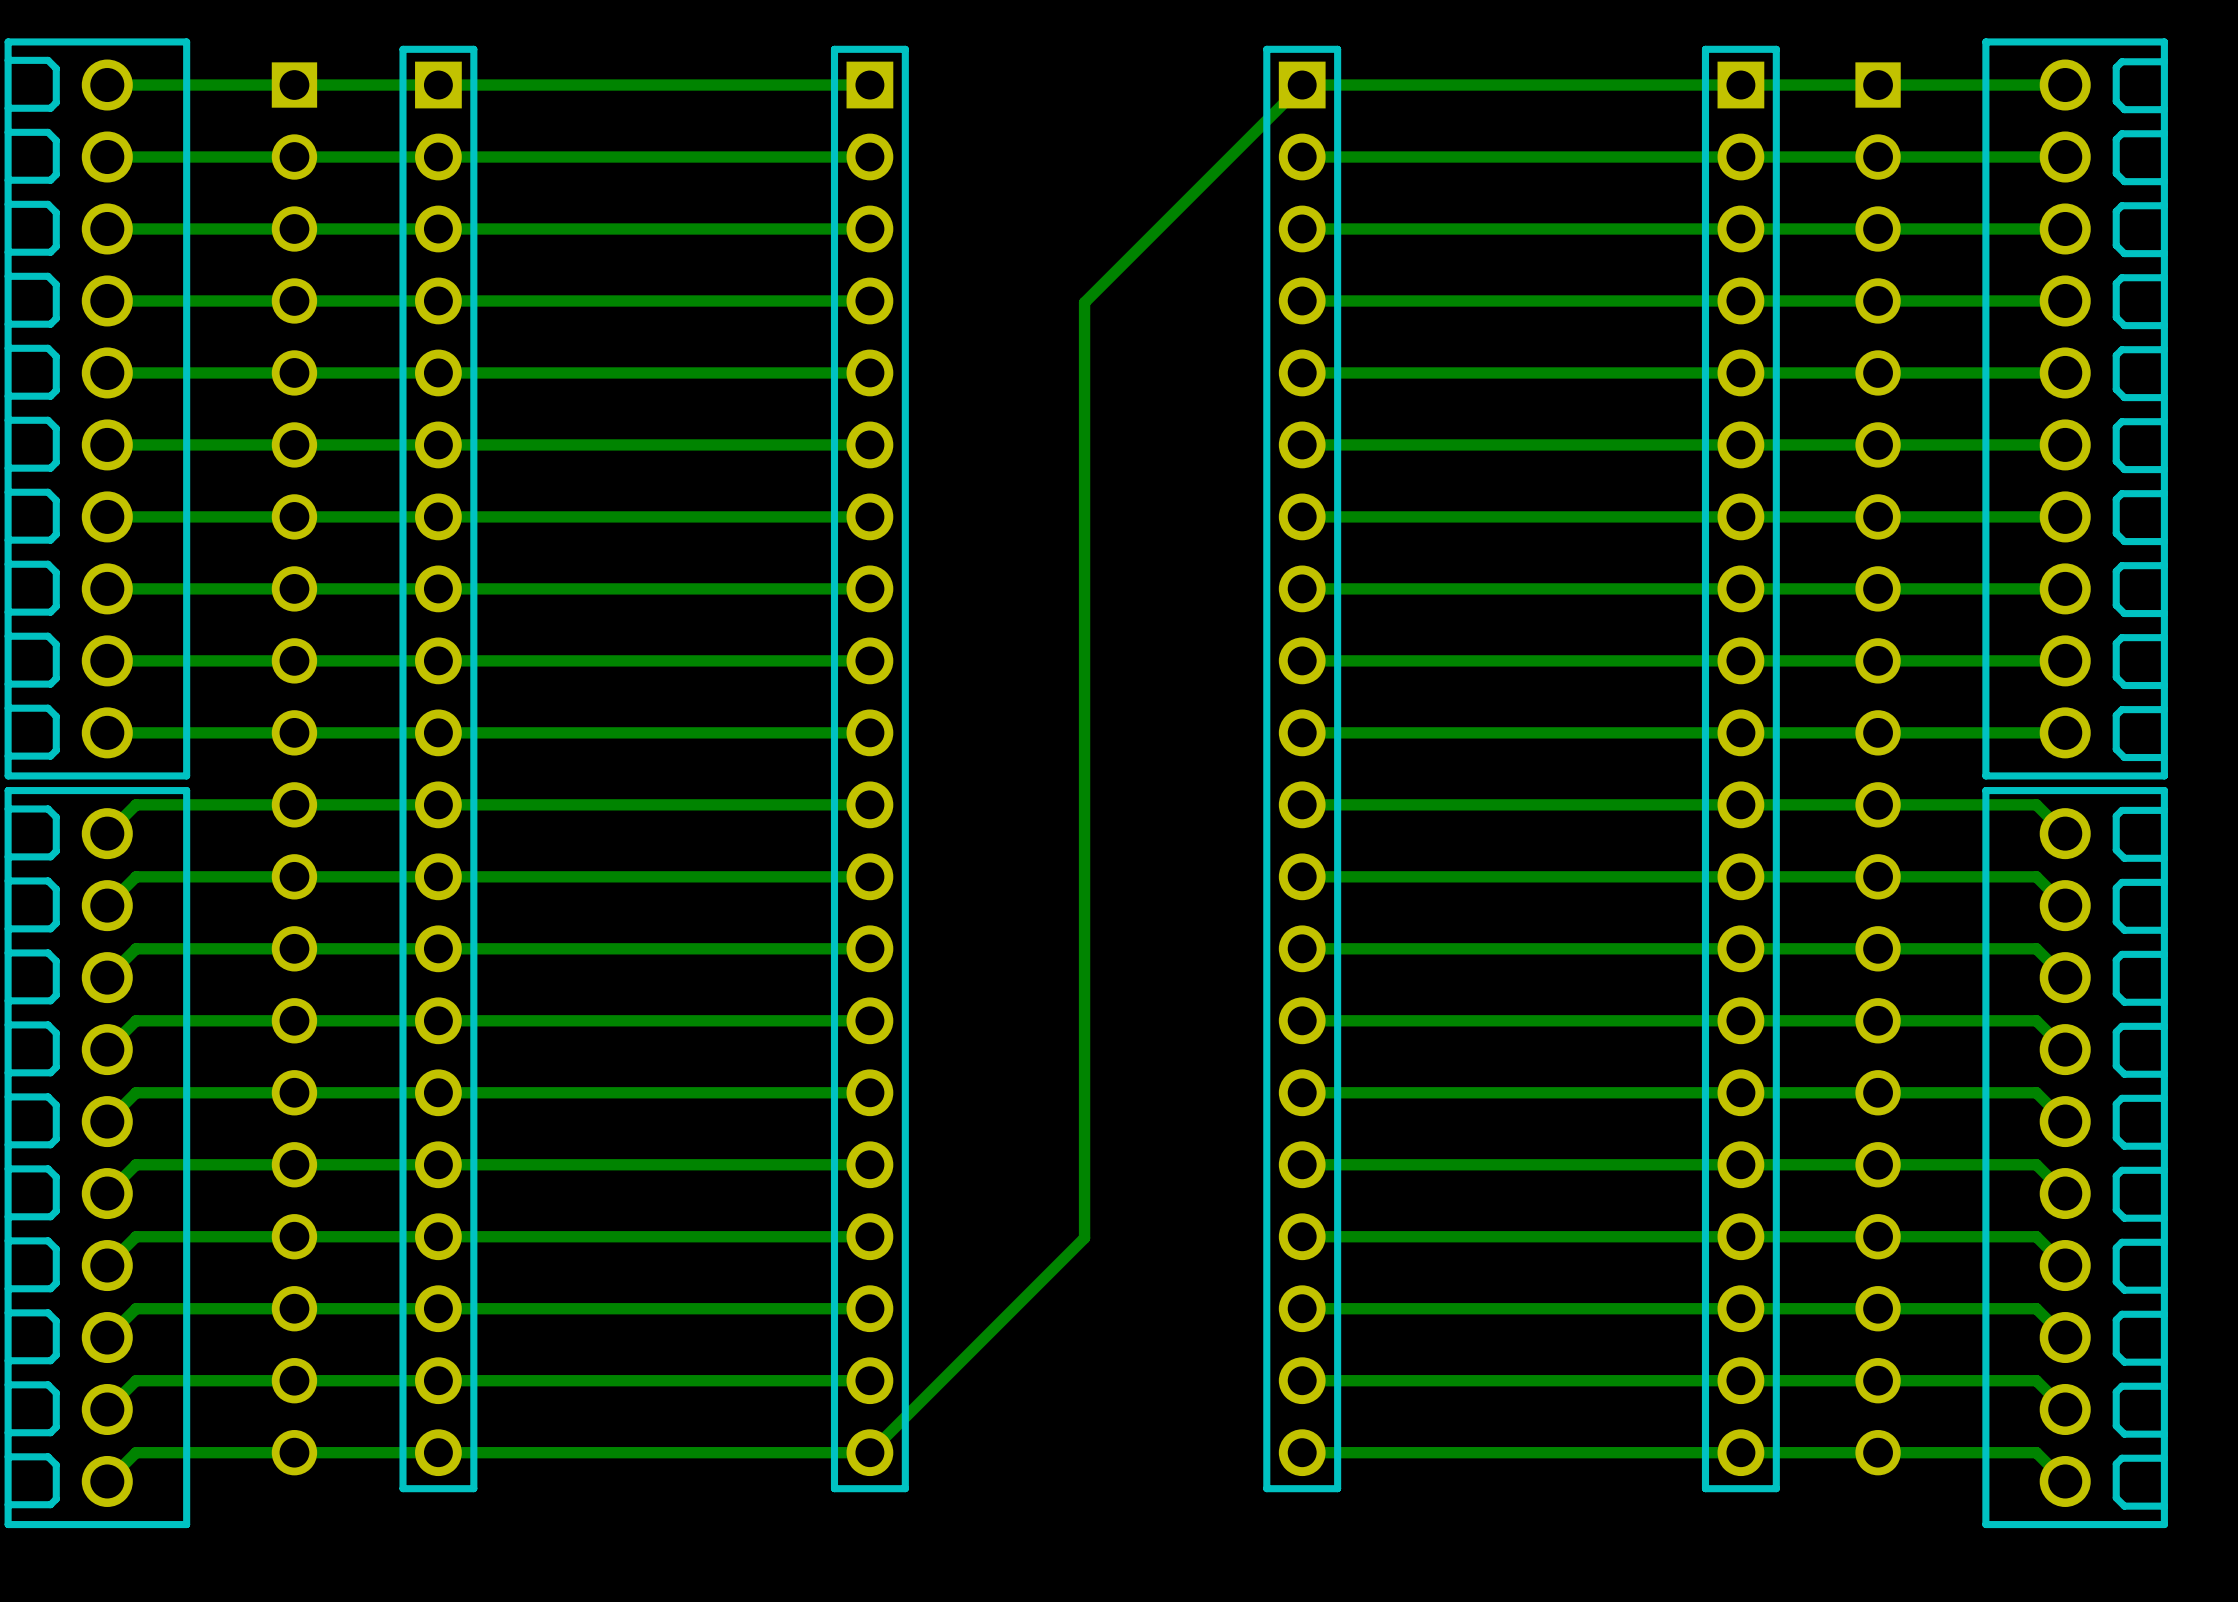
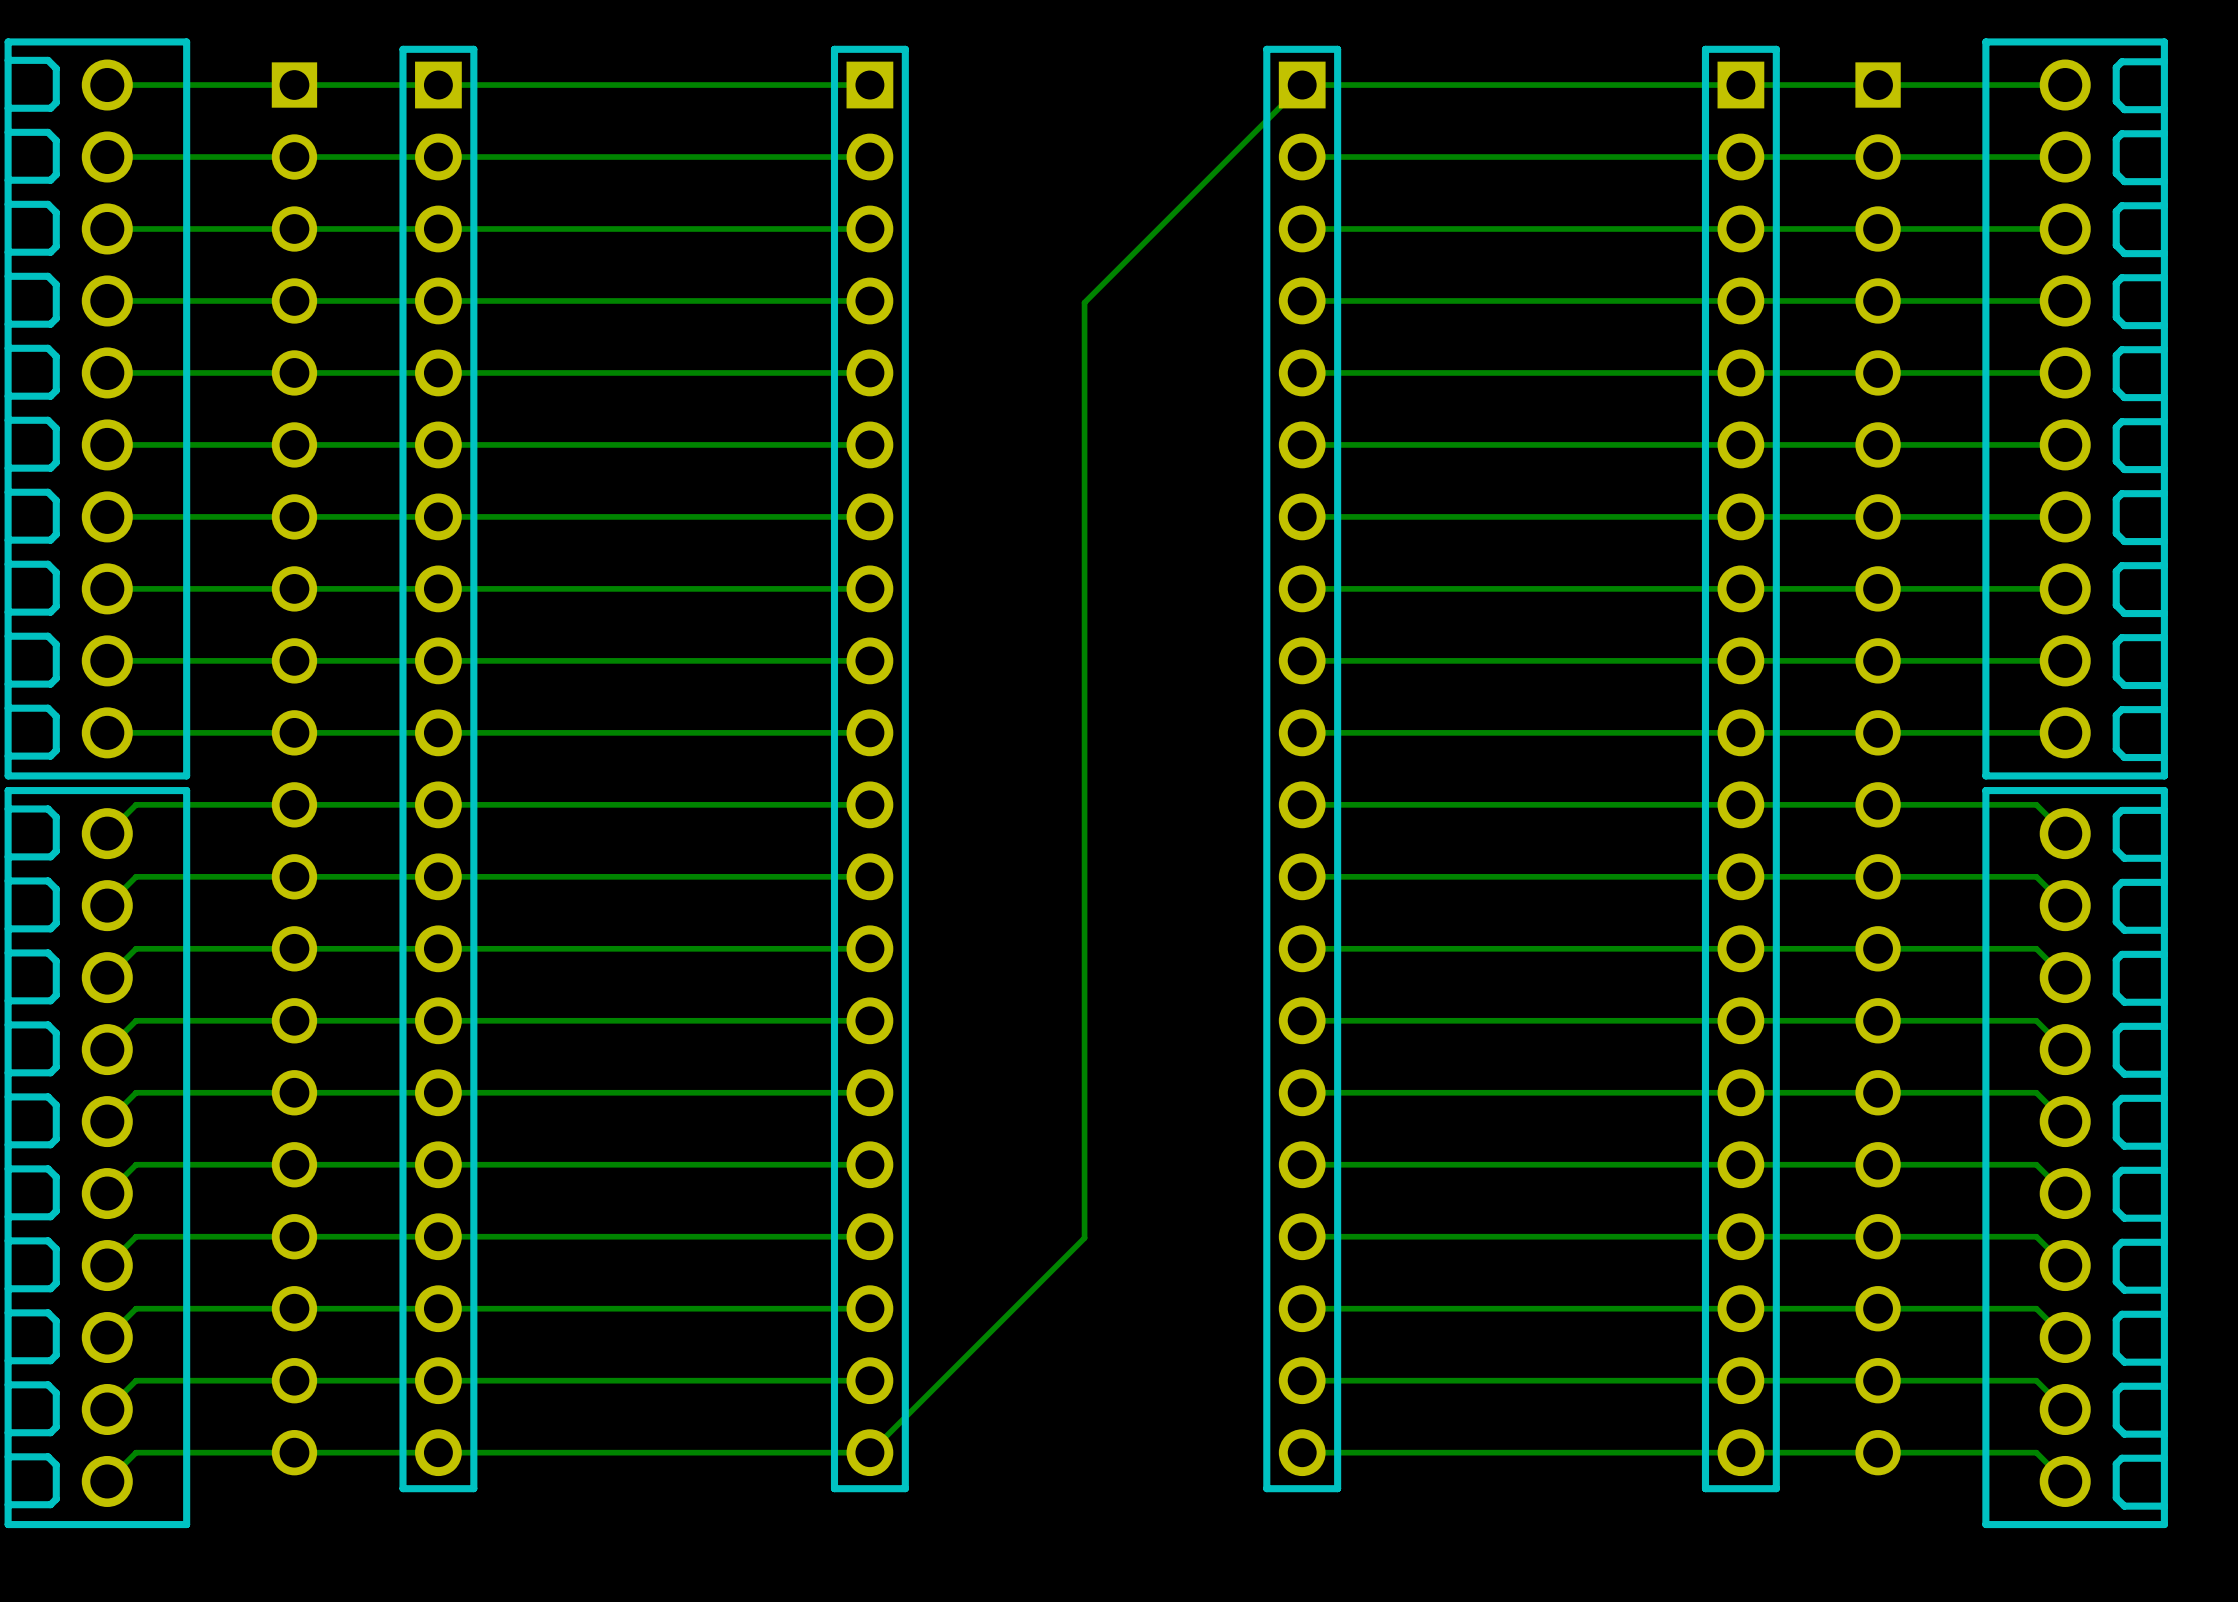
bottom track width: thick (107, 85) (869, 85) -> thin (107, 85) (869, 85)
bottom track width: thick (2065, 85) (1302, 85) (1084, 302) (1084, 1238) (869, 1452) (136, 1452) (107, 1481) -> thin (2065, 85) (1302, 85) (1084, 302) (1084, 1238) (869, 1452) (136, 1452) (107, 1481)
bottom track width: thick (107, 157) (869, 157) -> thin (107, 157) (869, 157)
bottom track width: thick (1302, 157) (2065, 157) -> thin (1302, 157) (2065, 157)
bottom track width: thick (107, 228) (869, 228) -> thin (107, 228) (869, 228)
bottom track width: thick (1302, 228) (2065, 228) -> thin (1302, 228) (2065, 228)
bottom track width: thick (107, 300) (869, 300) -> thin (107, 300) (869, 300)
bottom track width: thick (1302, 300) (2065, 300) -> thin (1302, 300) (2065, 300)
bottom track width: thick (107, 372) (869, 372) -> thin (107, 372) (869, 372)
bottom track width: thick (1302, 372) (2065, 372) -> thin (1302, 372) (2065, 372)
bottom track width: thick (107, 444) (869, 444) -> thin (107, 444) (869, 444)
bottom track width: thick (1302, 444) (2065, 444) -> thin (1302, 444) (2065, 444)
bottom track width: thick (107, 516) (869, 516) -> thin (107, 516) (869, 516)
bottom track width: thick (1302, 516) (2065, 516) -> thin (1302, 516) (2065, 516)
bottom track width: thick (107, 588) (869, 588) -> thin (107, 588) (869, 588)
bottom track width: thick (1302, 588) (2065, 588) -> thin (1302, 588) (2065, 588)
bottom track width: thick (107, 660) (869, 660) -> thin (107, 660) (869, 660)
bottom track width: thick (1302, 660) (2065, 660) -> thin (1302, 660) (2065, 660)
bottom track width: thick (107, 732) (869, 732) -> thin (107, 732) (869, 732)
bottom track width: thick (1302, 732) (2065, 732) -> thin (1302, 732) (2065, 732)
bottom track width: thick (869, 804) (136, 804) (107, 833) -> thin (869, 804) (136, 804) (107, 833)
bottom track width: thick (1302, 804) (2036, 804) (2065, 833) -> thin (1302, 804) (2036, 804) (2065, 833)
bottom track width: thick (869, 876) (136, 876) (107, 905) -> thin (869, 876) (136, 876) (107, 905)
bottom track width: thick (1302, 876) (2036, 876) (2065, 905) -> thin (1302, 876) (2036, 876) (2065, 905)
bottom track width: thick (869, 948) (136, 948) (107, 977) -> thin (869, 948) (136, 948) (107, 977)
bottom track width: thick (1302, 948) (2036, 948) (2065, 977) -> thin (1302, 948) (2036, 948) (2065, 977)
bottom track width: thick (869, 1020) (136, 1020) (107, 1049) -> thin (869, 1020) (136, 1020) (107, 1049)
bottom track width: thick (1302, 1020) (2036, 1020) (2065, 1049) -> thin (1302, 1020) (2036, 1020) (2065, 1049)
bottom track width: thick (869, 1092) (136, 1092) (107, 1121) -> thin (869, 1092) (136, 1092) (107, 1121)
bottom track width: thick (1302, 1092) (2036, 1092) (2065, 1121) -> thin (1302, 1092) (2036, 1092) (2065, 1121)
bottom track width: thick (869, 1164) (136, 1164) (107, 1193) -> thin (869, 1164) (136, 1164) (107, 1193)
bottom track width: thick (1302, 1164) (2036, 1164) (2065, 1193) -> thin (1302, 1164) (2036, 1164) (2065, 1193)
bottom track width: thick (869, 1236) (136, 1236) (107, 1265) -> thin (869, 1236) (136, 1236) (107, 1265)
bottom track width: thick (1302, 1236) (2036, 1236) (2065, 1265) -> thin (1302, 1236) (2036, 1236) (2065, 1265)
bottom track width: thick (869, 1308) (136, 1308) (107, 1337) -> thin (869, 1308) (136, 1308) (107, 1337)
bottom track width: thick (1302, 1308) (2036, 1308) (2065, 1337) -> thin (1302, 1308) (2036, 1308) (2065, 1337)
bottom track width: thick (869, 1380) (136, 1380) (107, 1409) -> thin (869, 1380) (136, 1380) (107, 1409)
bottom track width: thick (1302, 1380) (2036, 1380) (2065, 1409) -> thin (1302, 1380) (2036, 1380) (2065, 1409)
bottom track width: thick (1302, 1452) (2036, 1452) (2065, 1481) -> thin (1302, 1452) (2036, 1452) (2065, 1481)

